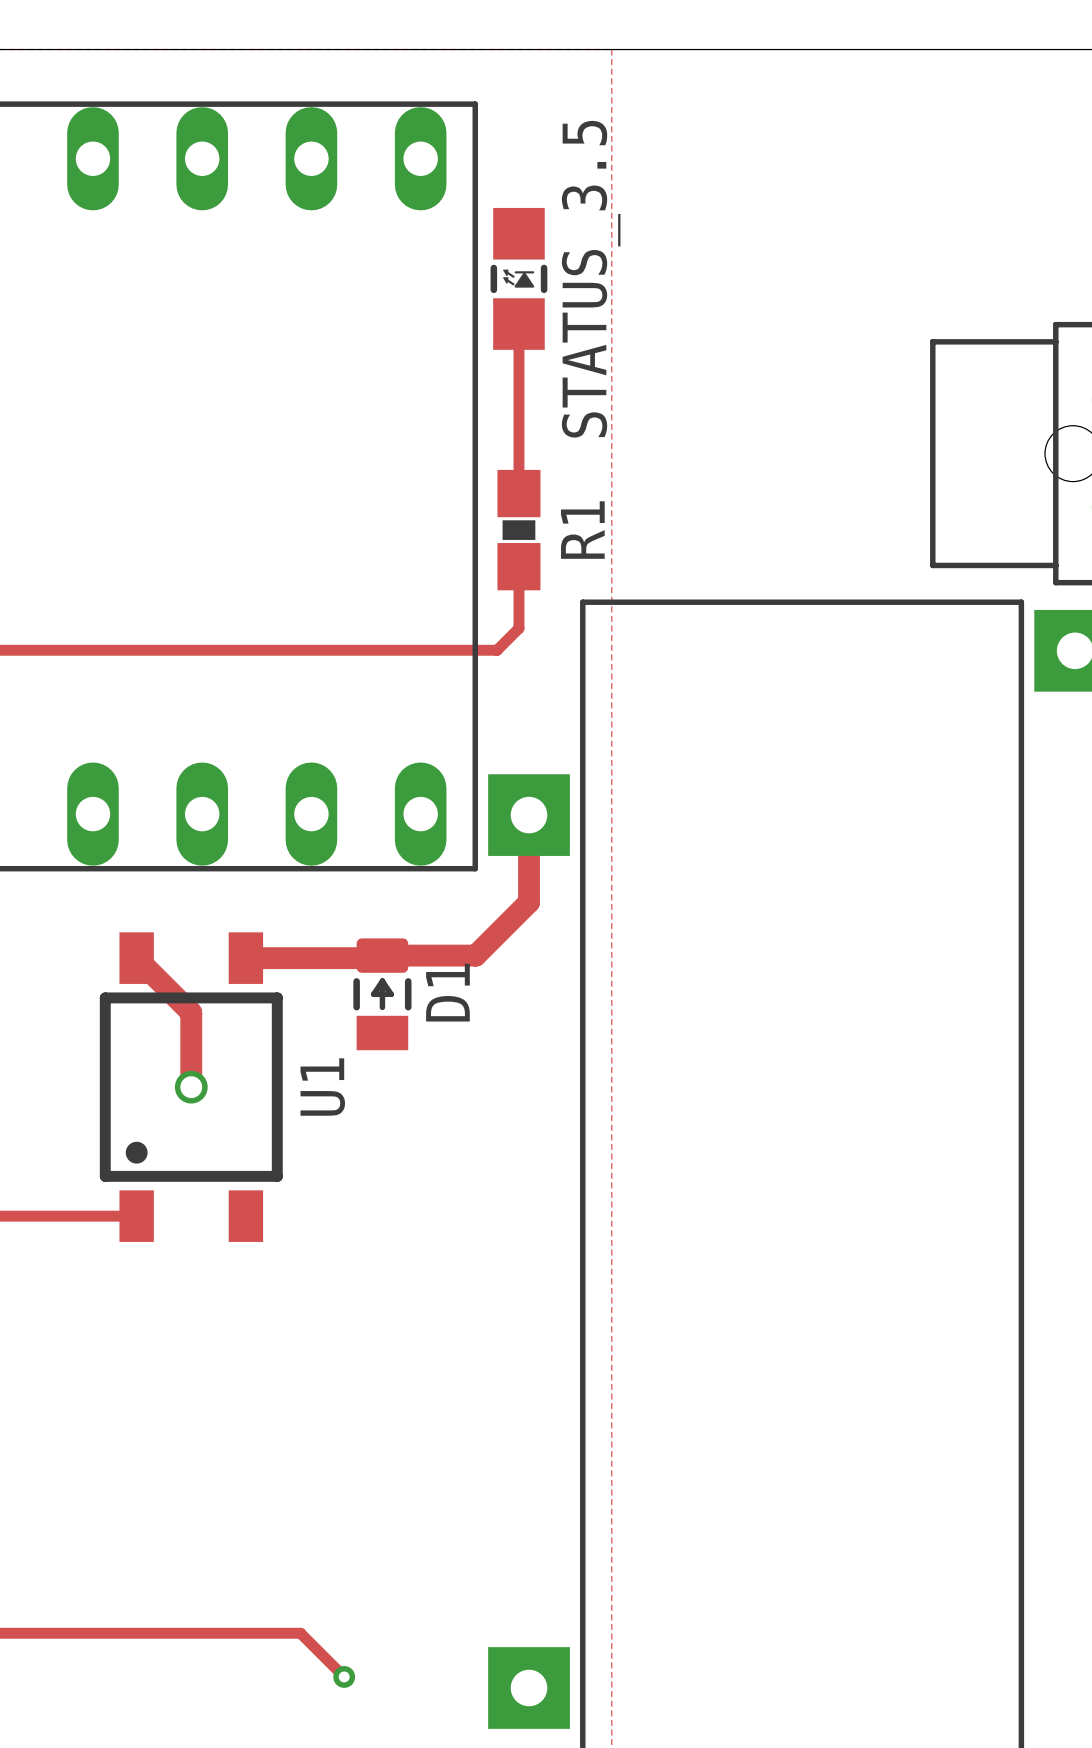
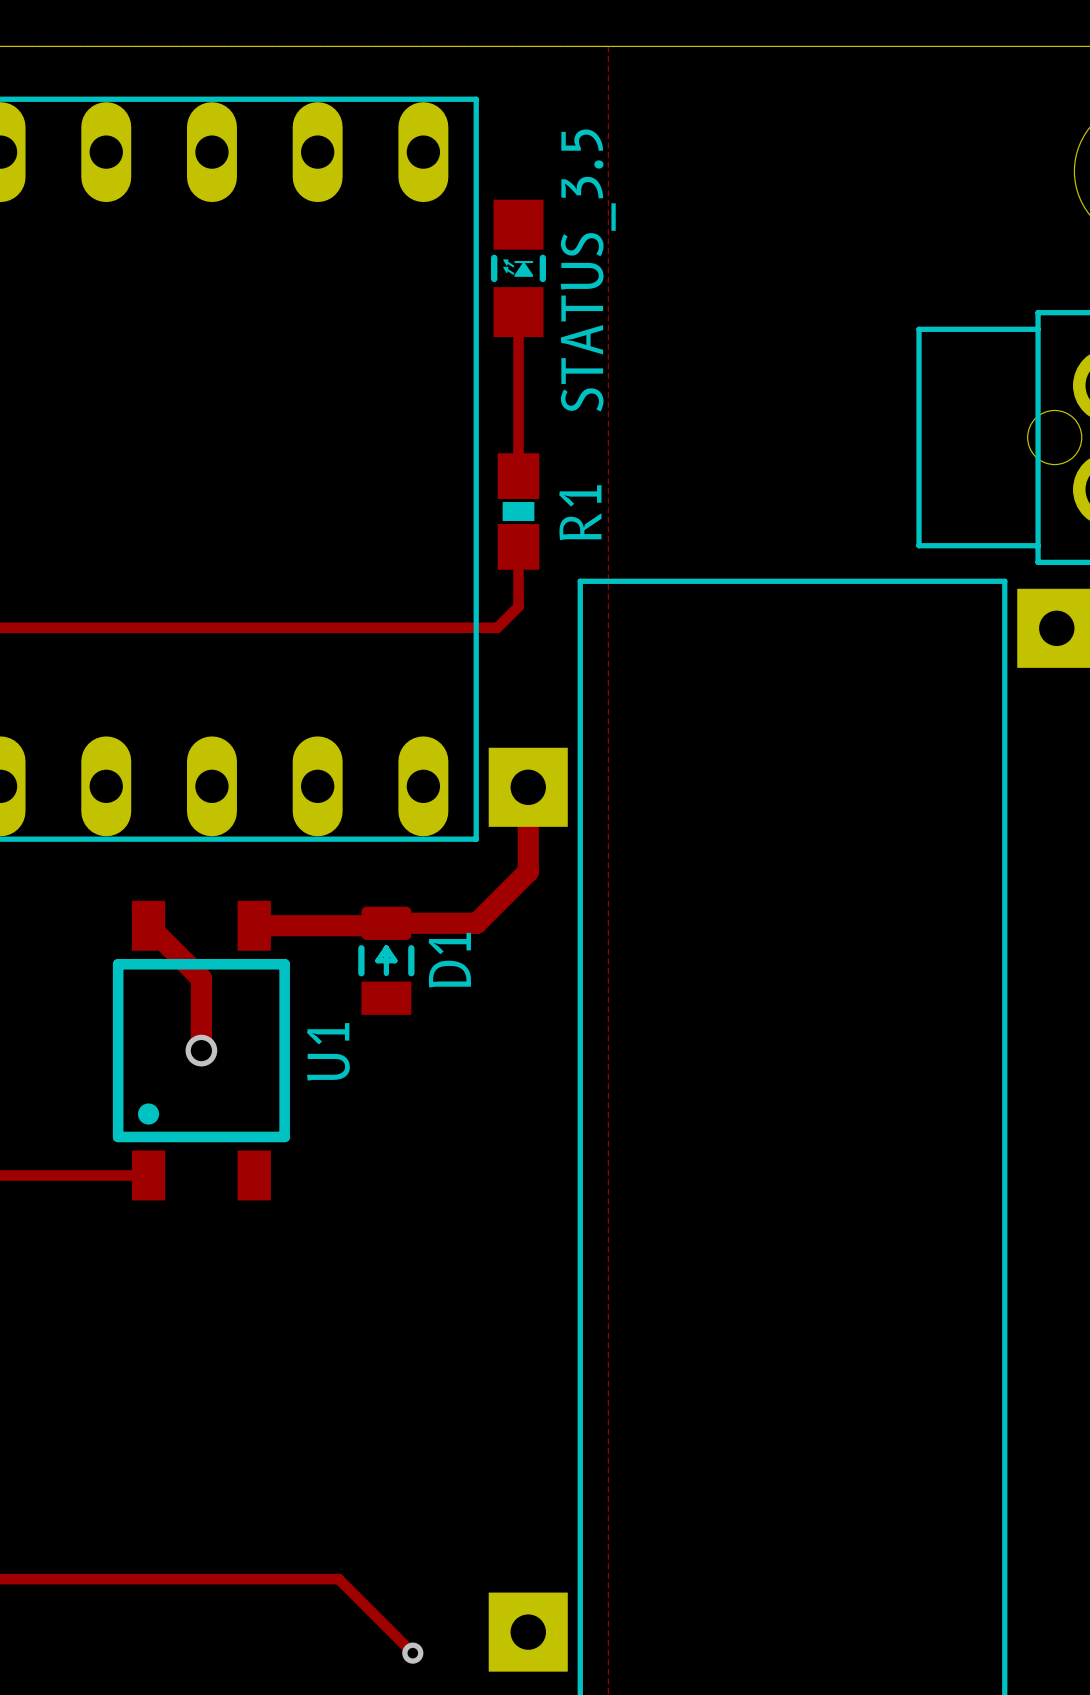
track: (300, 1633) (344, 1676) -> (307, 1579) (338, 1579) (412, 1653)
via position: (344, 1676) -> (412, 1653)

